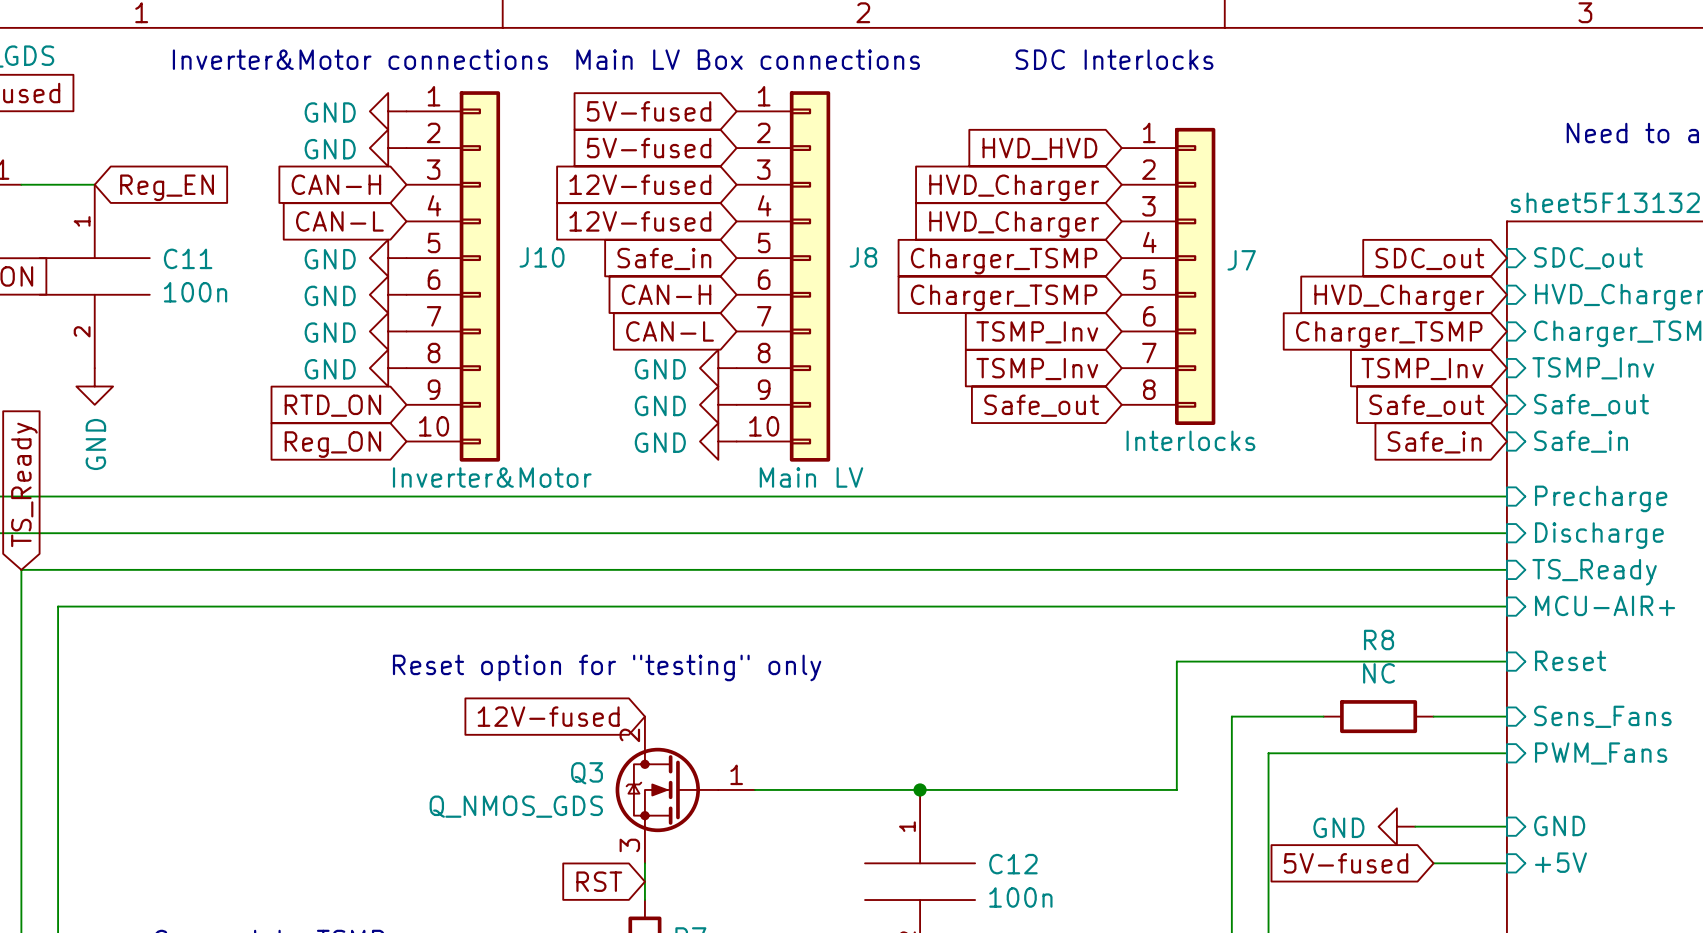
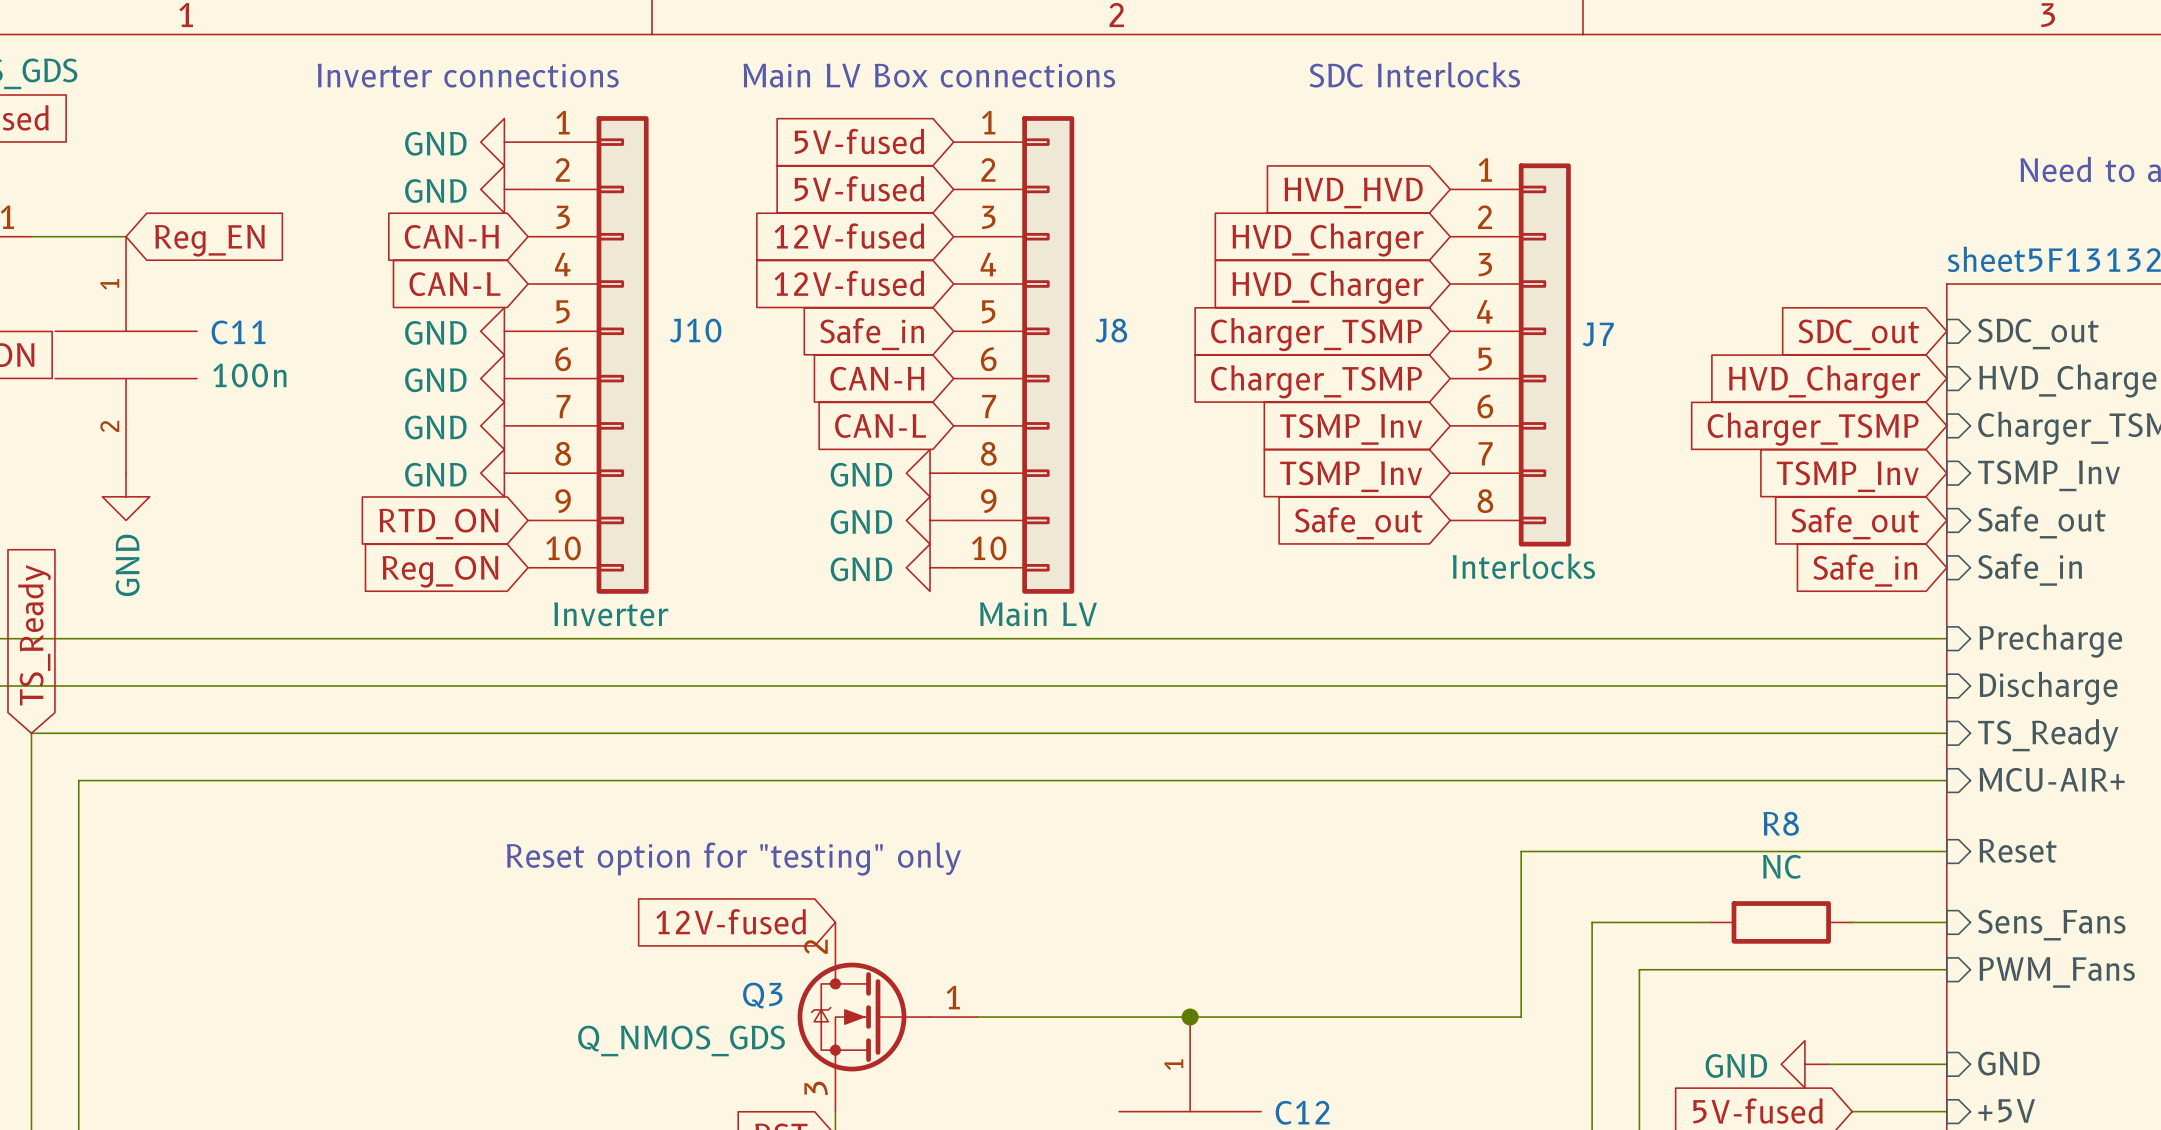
text: Inverter&Motor connections (360, 59) -> Inverter connections (468, 75)
J10 value: Inverter&Motor (492, 477) -> Inverter (611, 614)

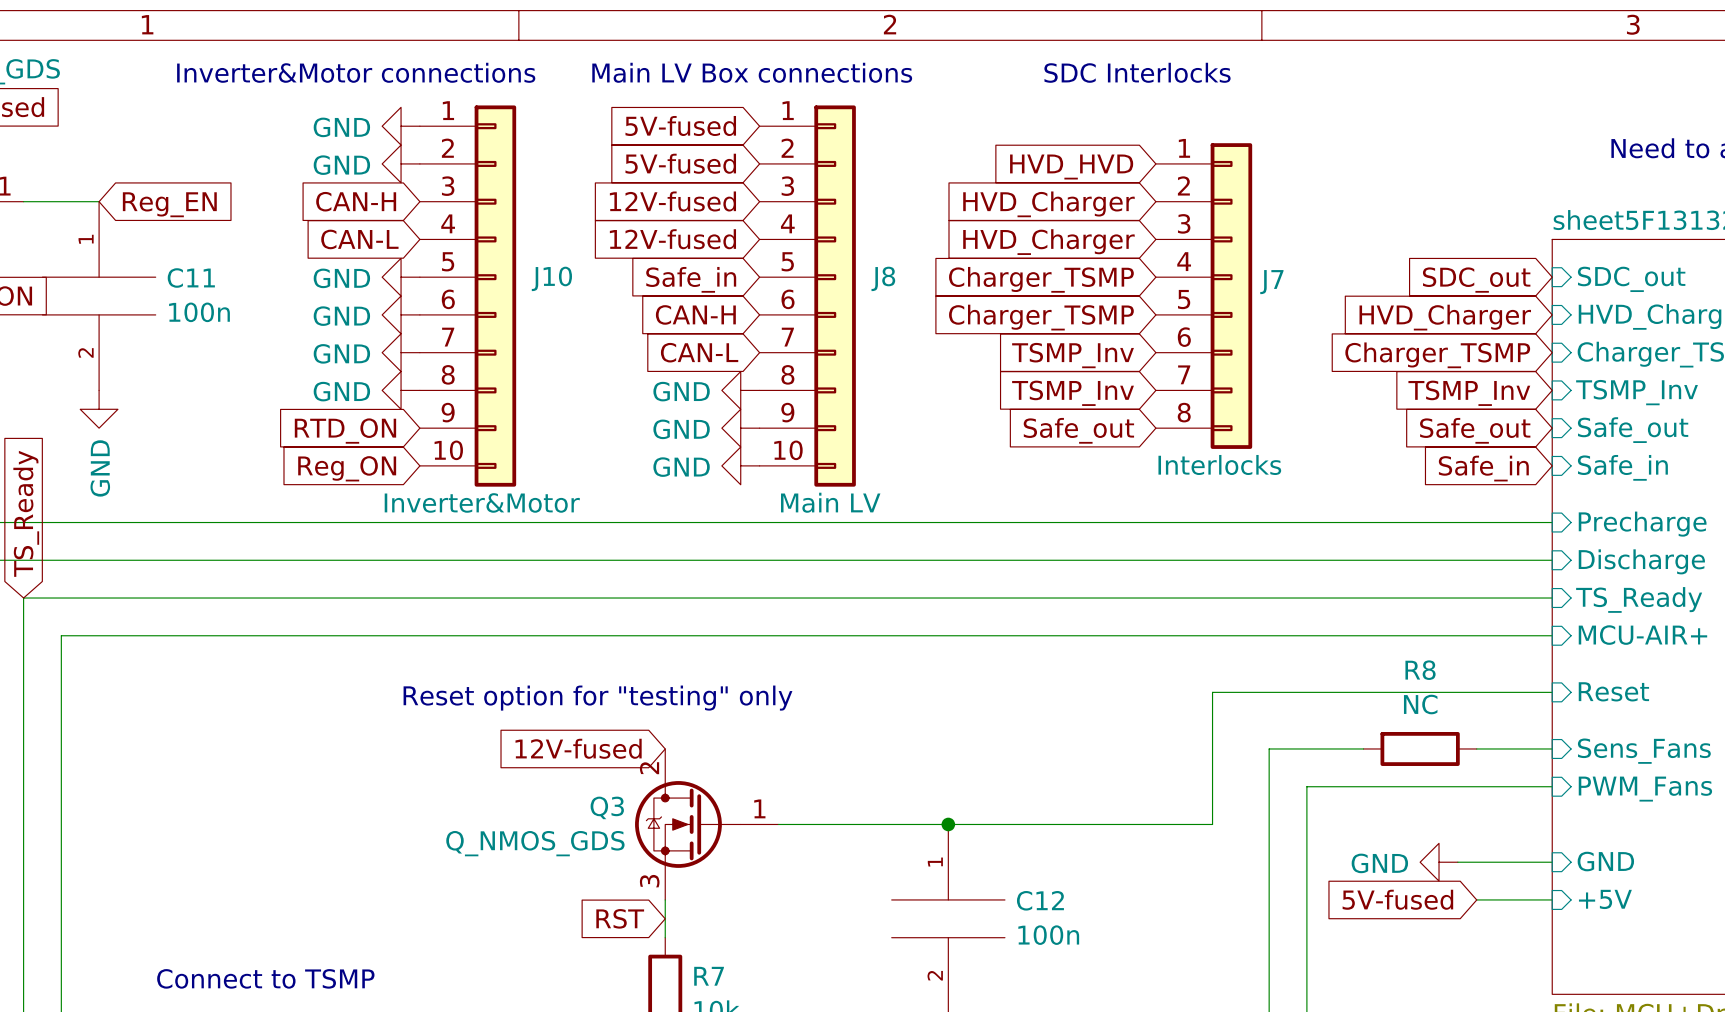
text: Inverter connections (468, 75) -> Inverter&Motor connections (356, 72)
J10 value: Inverter (611, 614) -> Inverter&Motor (482, 502)

